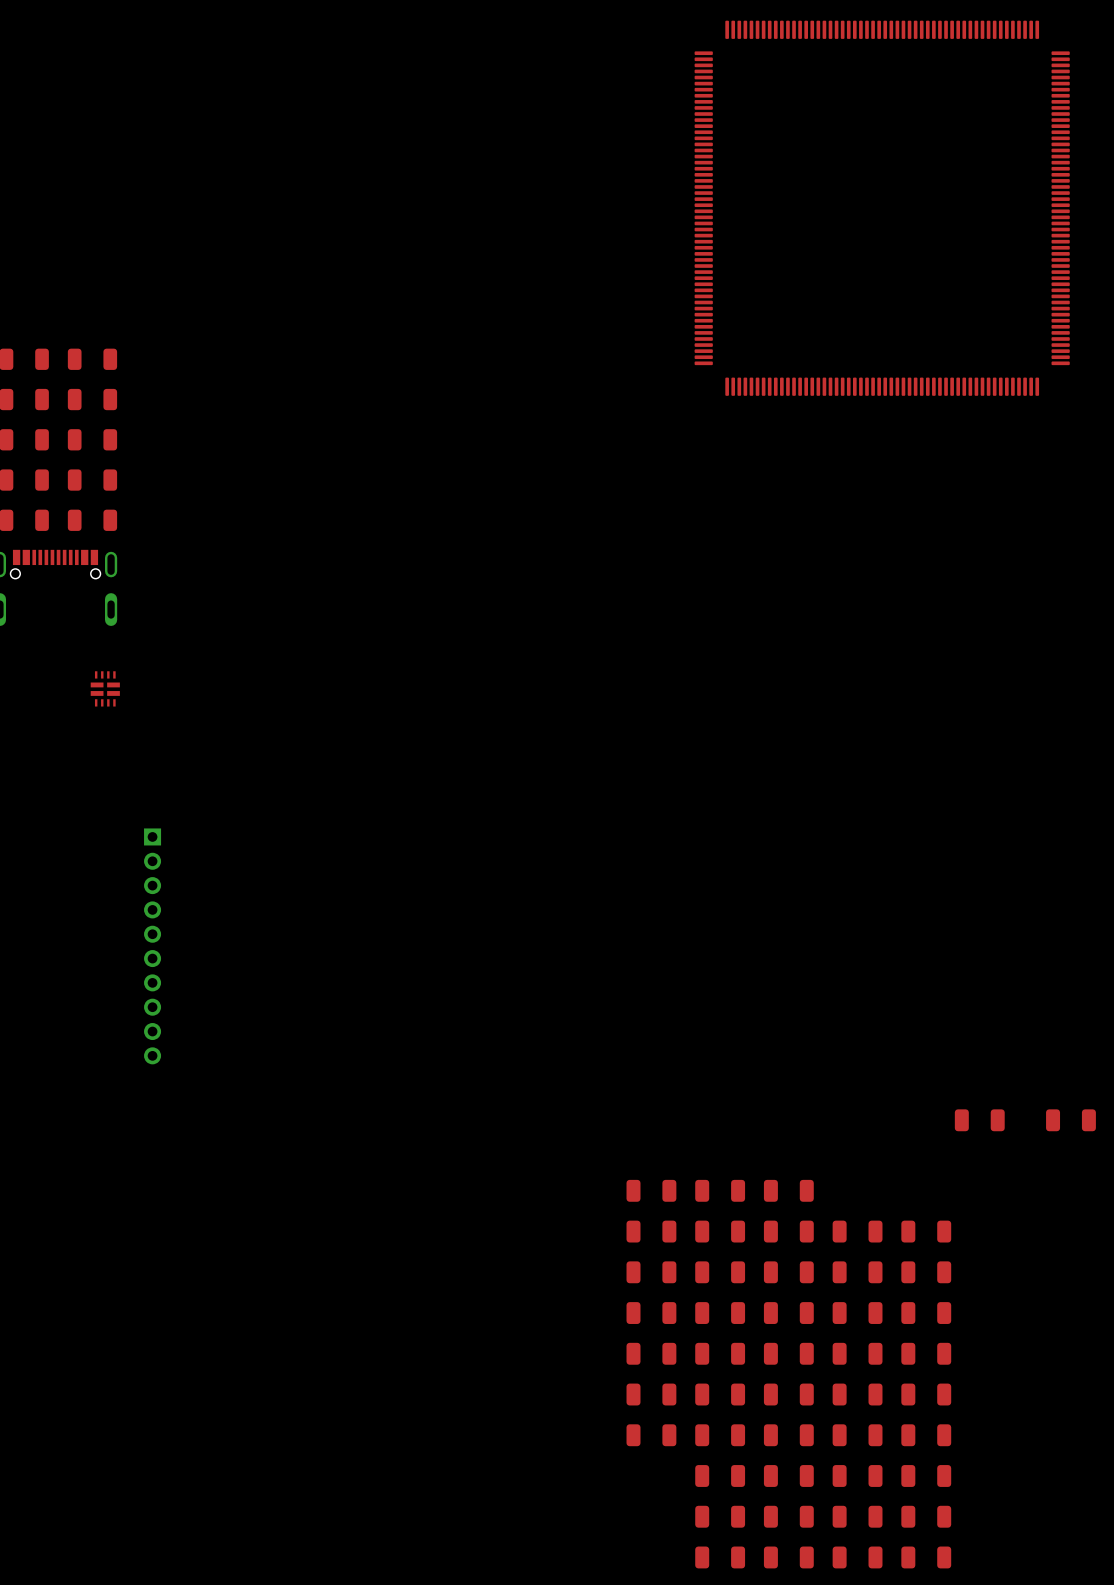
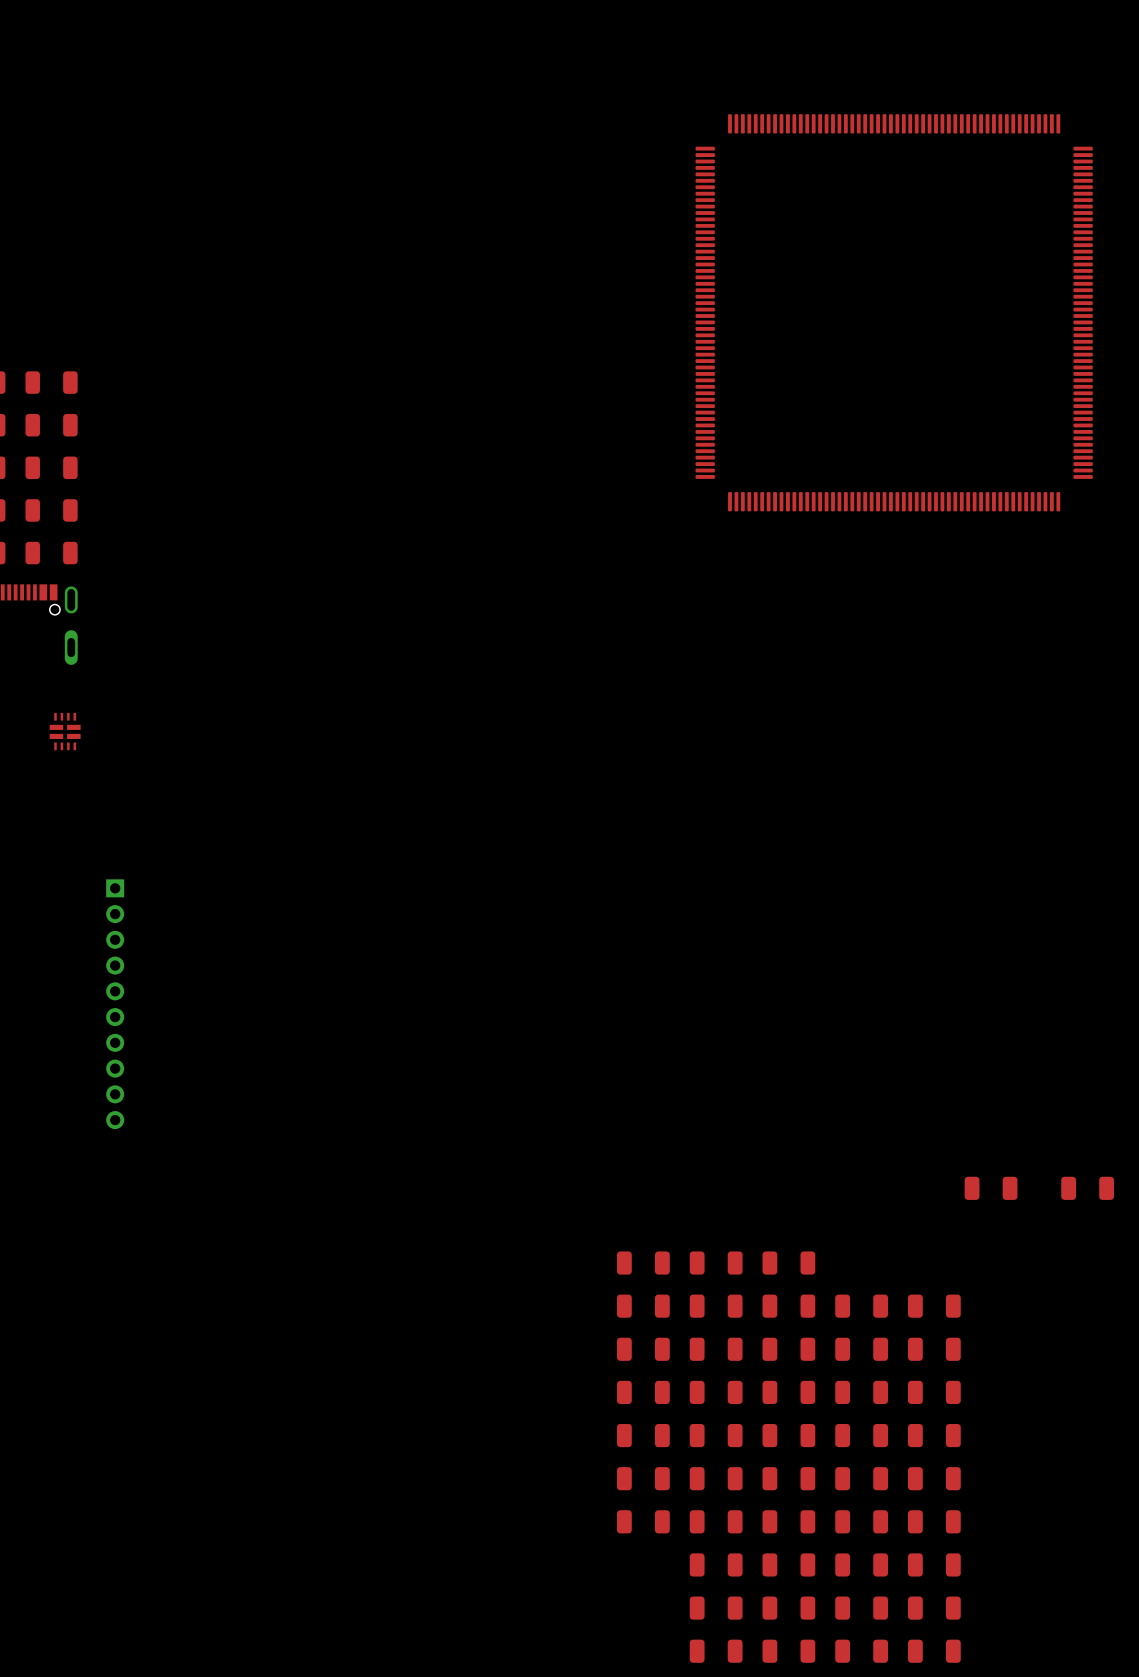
part position: (882, 208) -> (894, 312)

